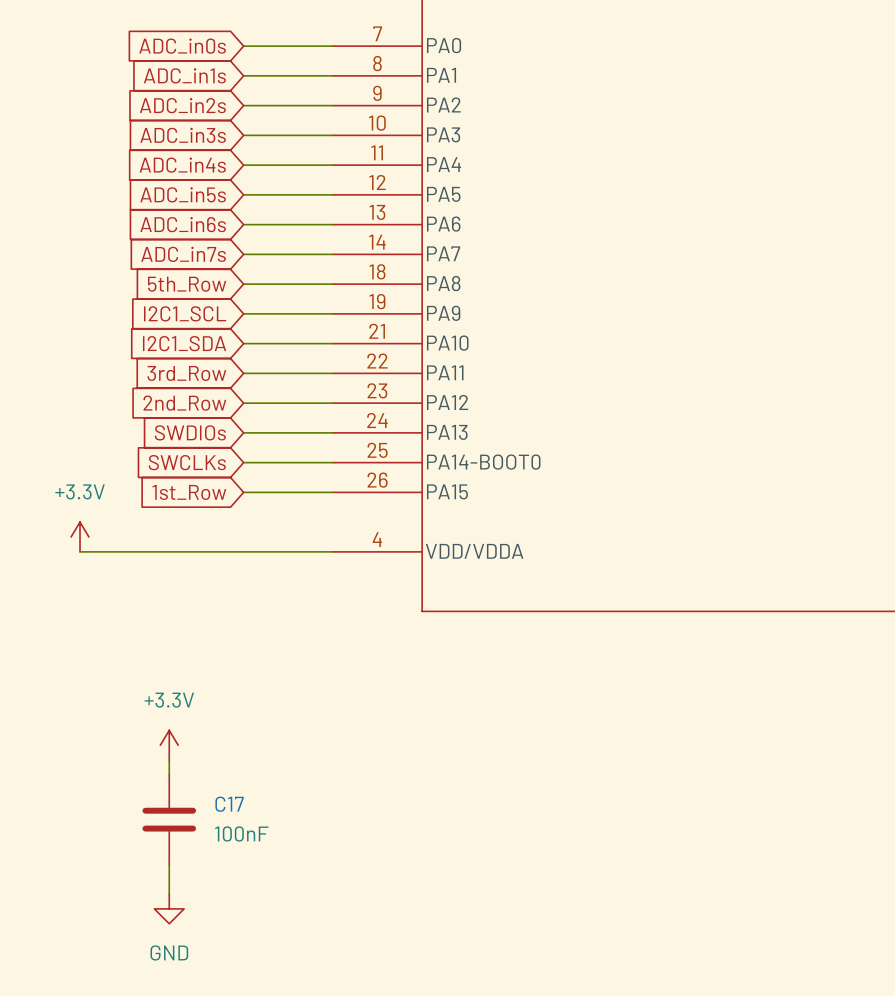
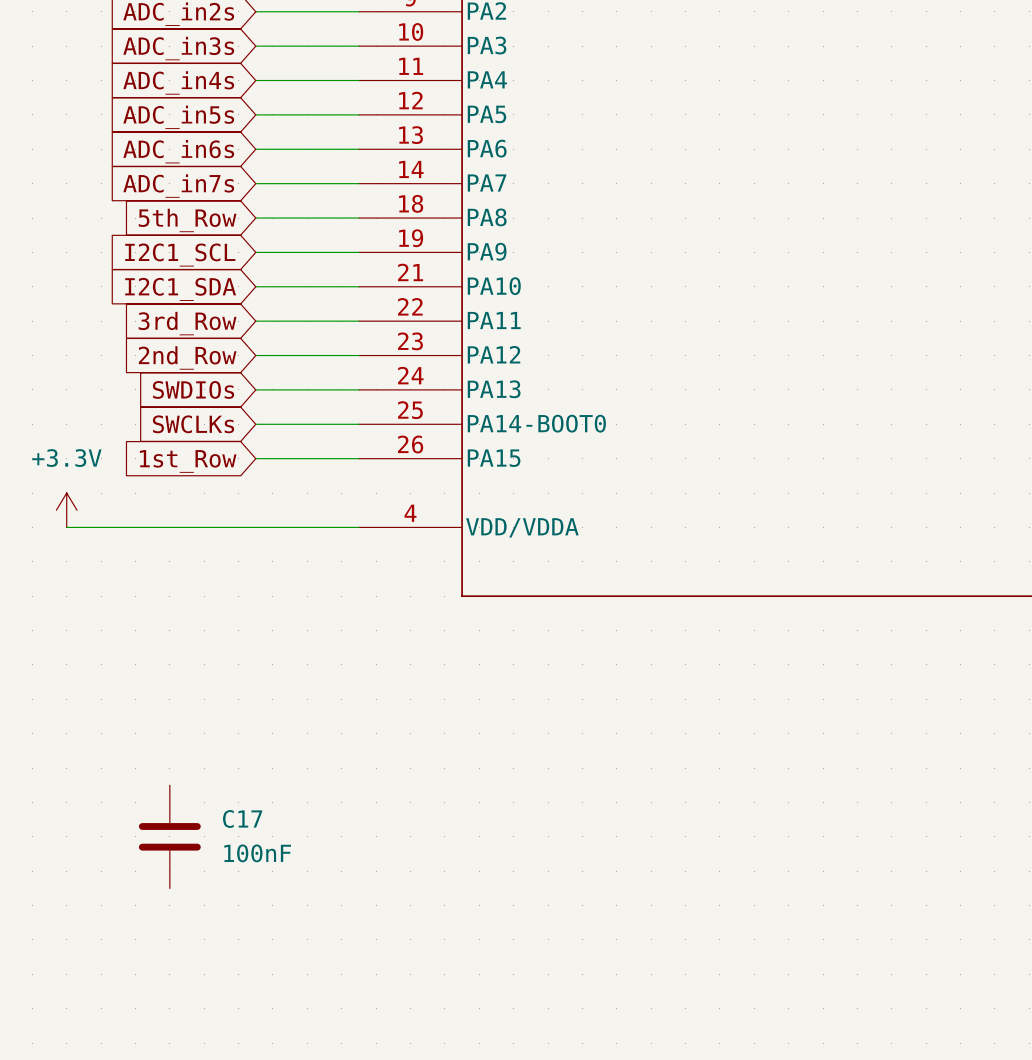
power symbol: +3.3V (169, 745) -> none
wire: (169, 760) (169, 775) -> none
wire: (169, 864) (169, 894) -> none
power symbol: GND (169, 908) -> none

